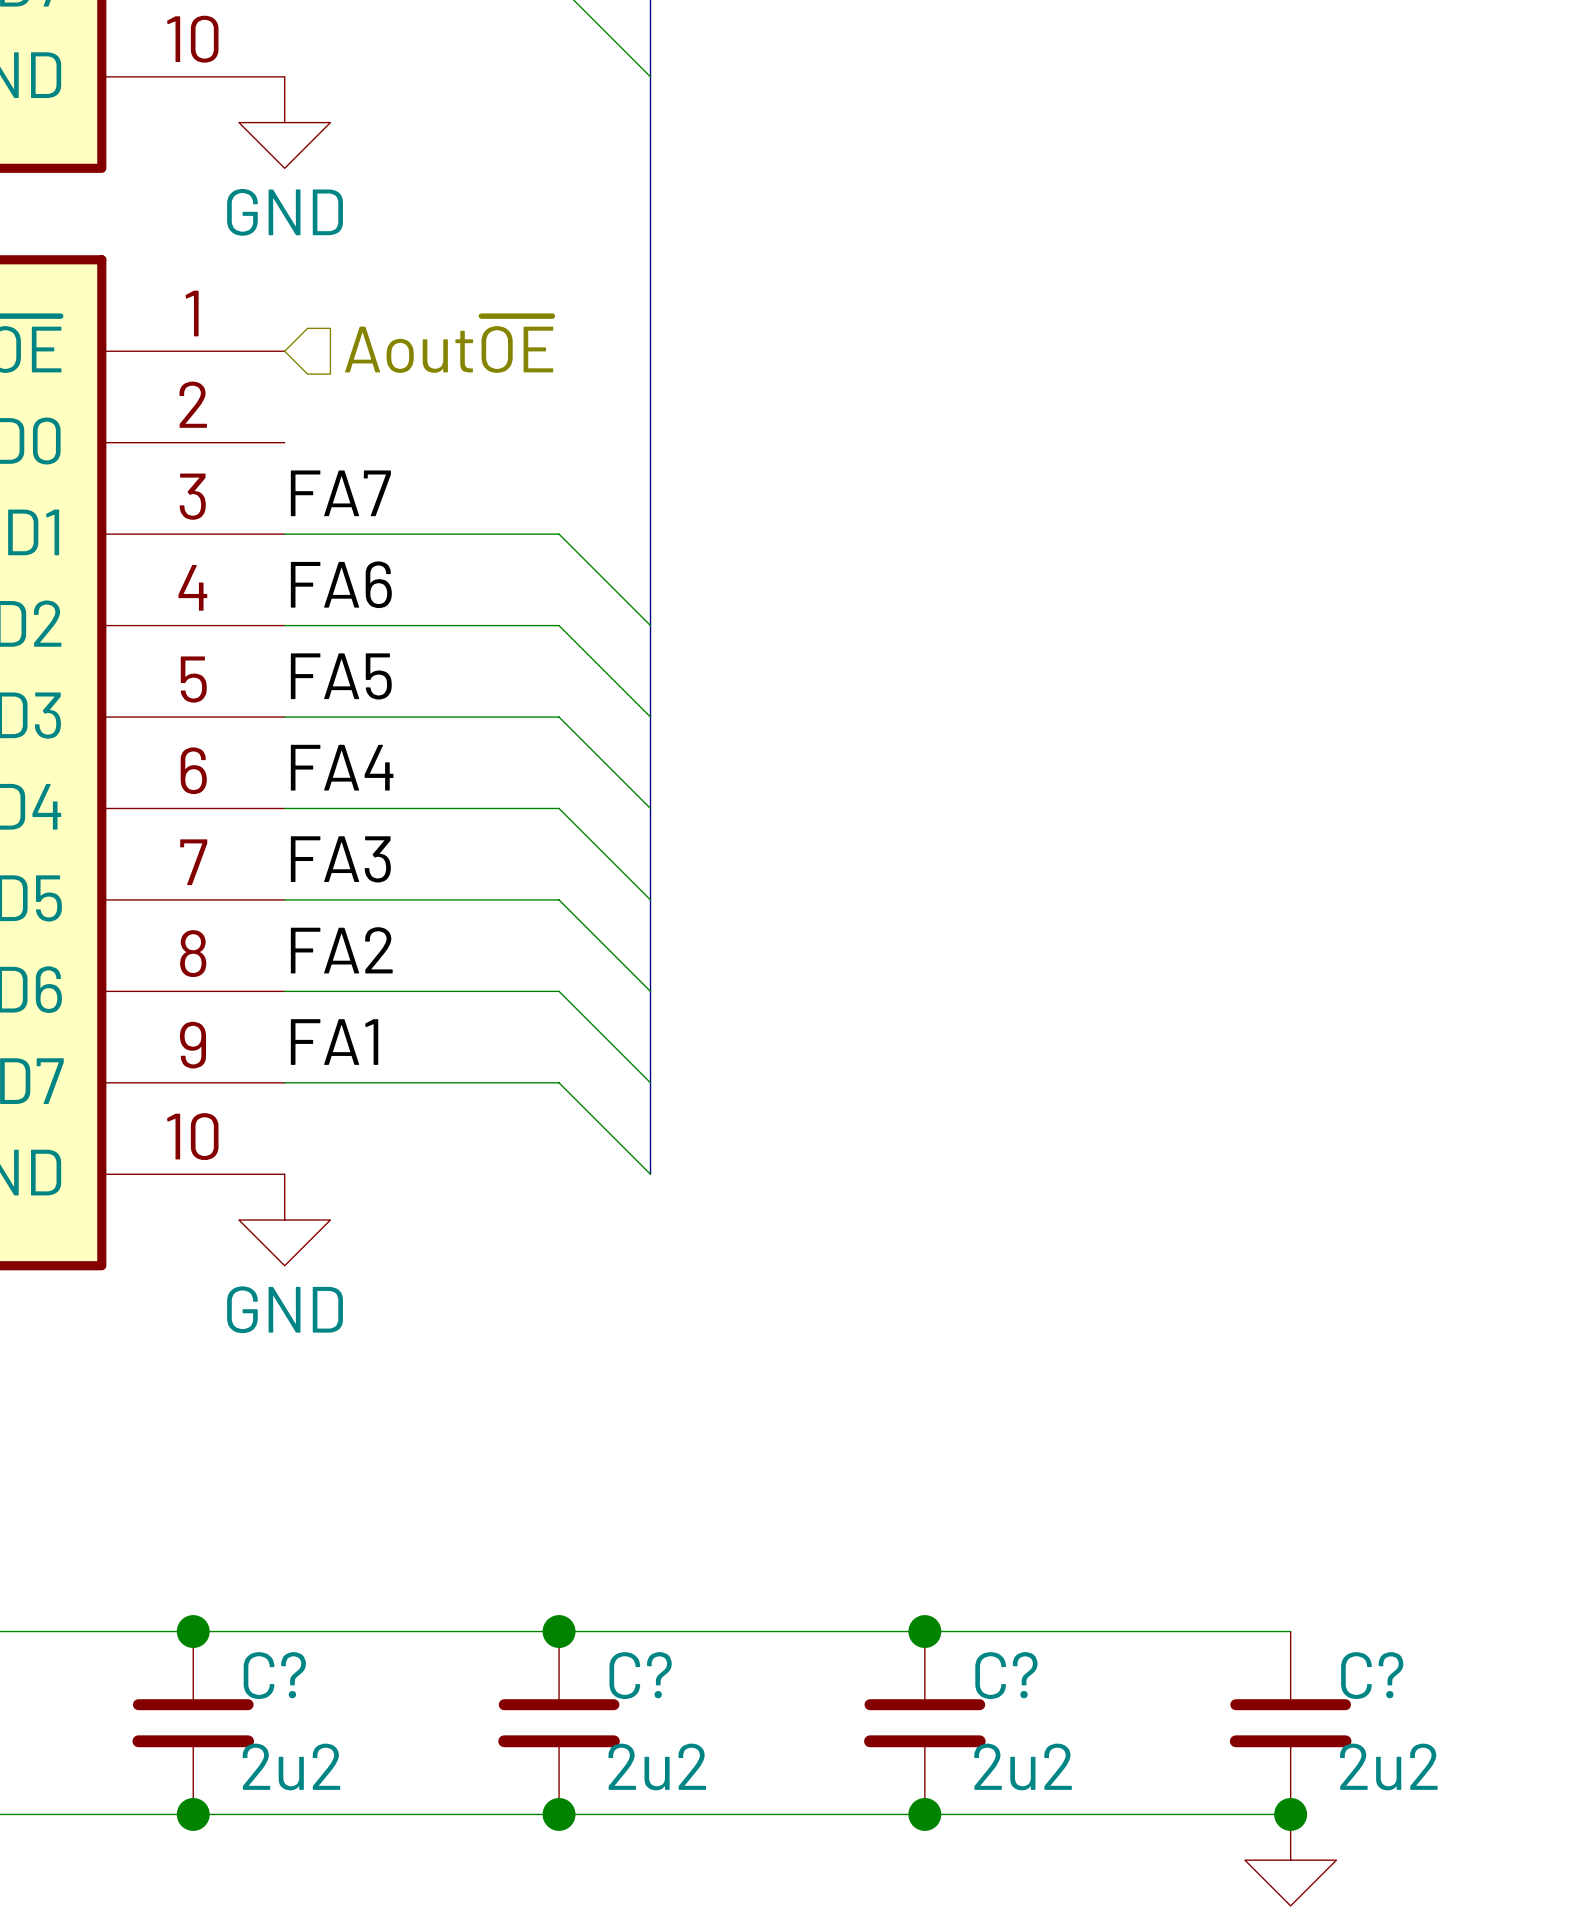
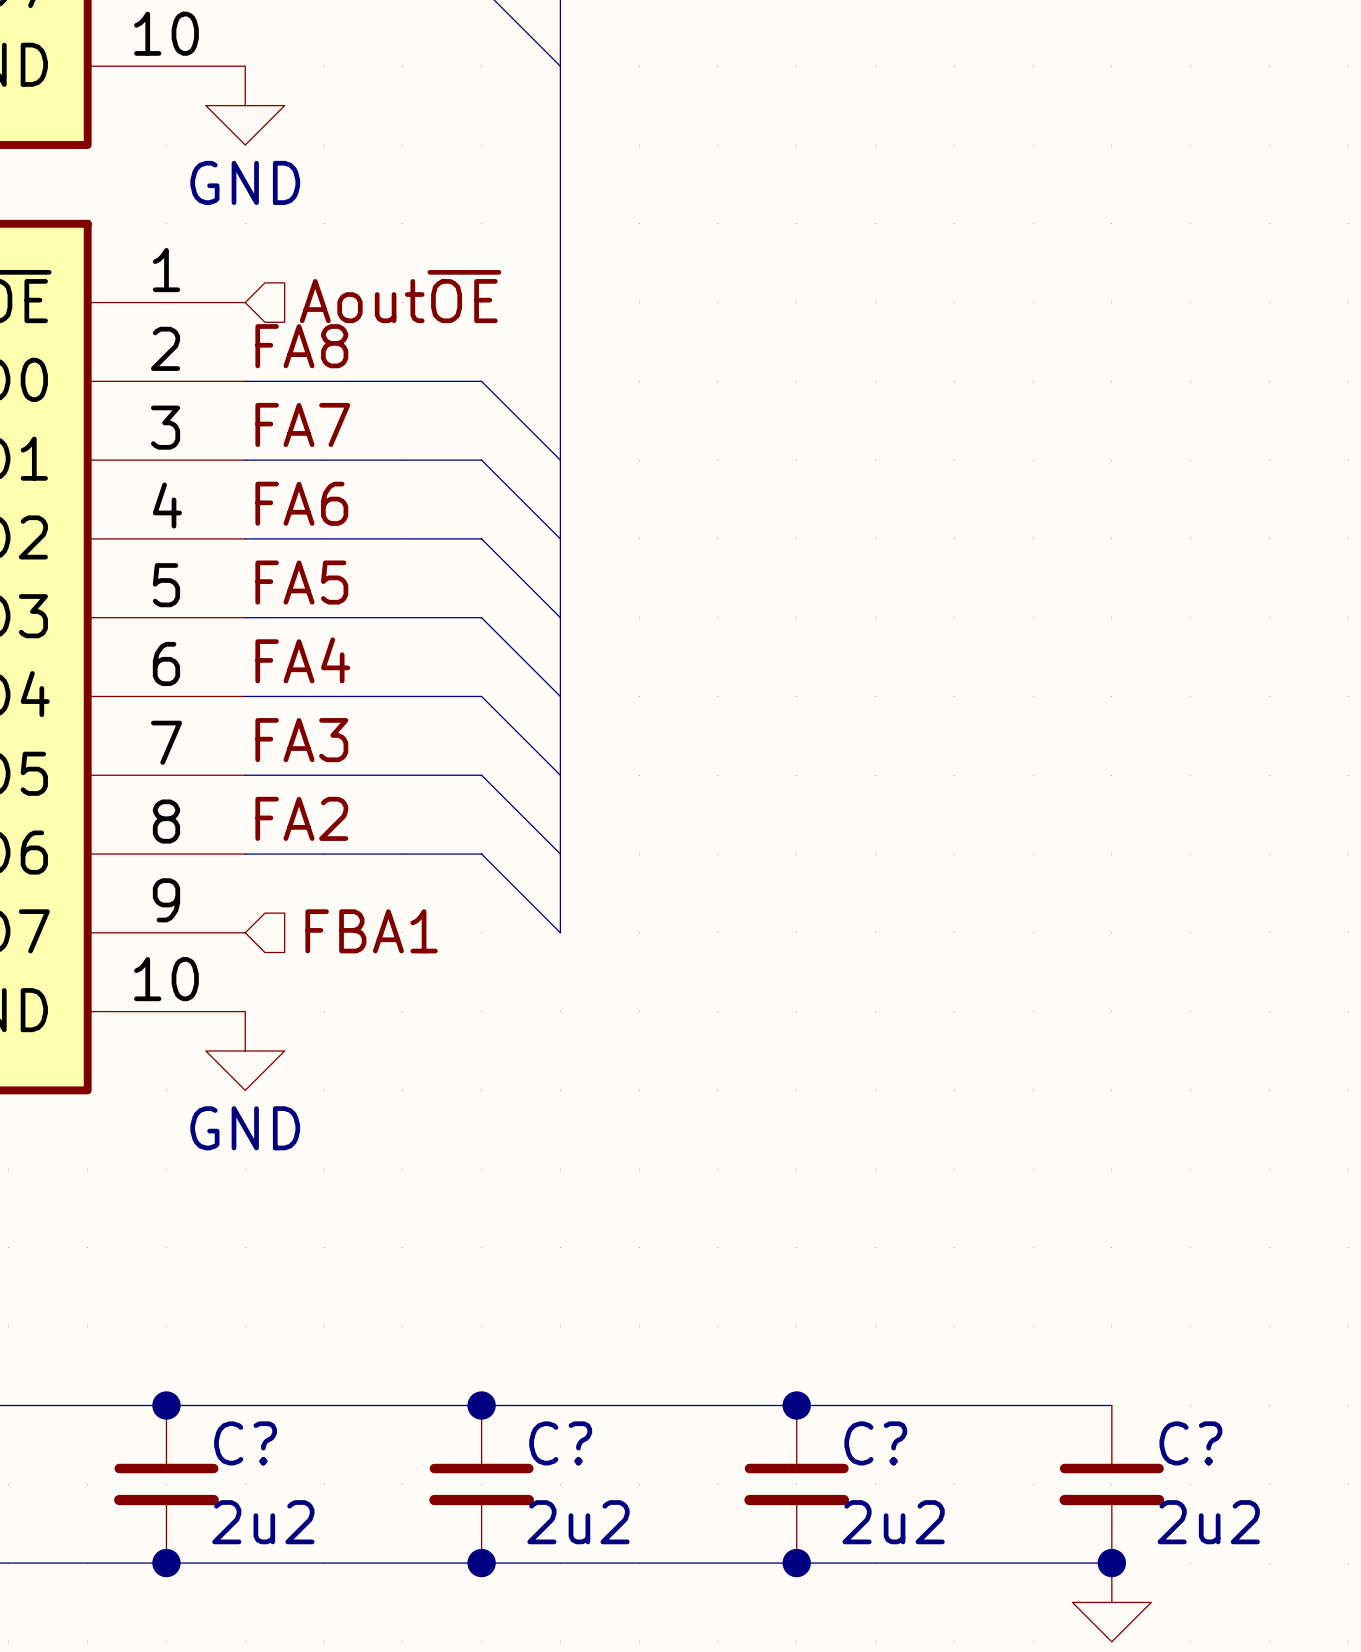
label: none -> FA8 (301, 346)
label: FA1 (334, 1042) -> none
hierarchical label: none -> FBA1 (371, 931)
wire: (284, 1082) (559, 1082) (650, 1174) -> (245, 381) (481, 381) (560, 460)
bus: (650, 1082) (650, 1174) -> none

